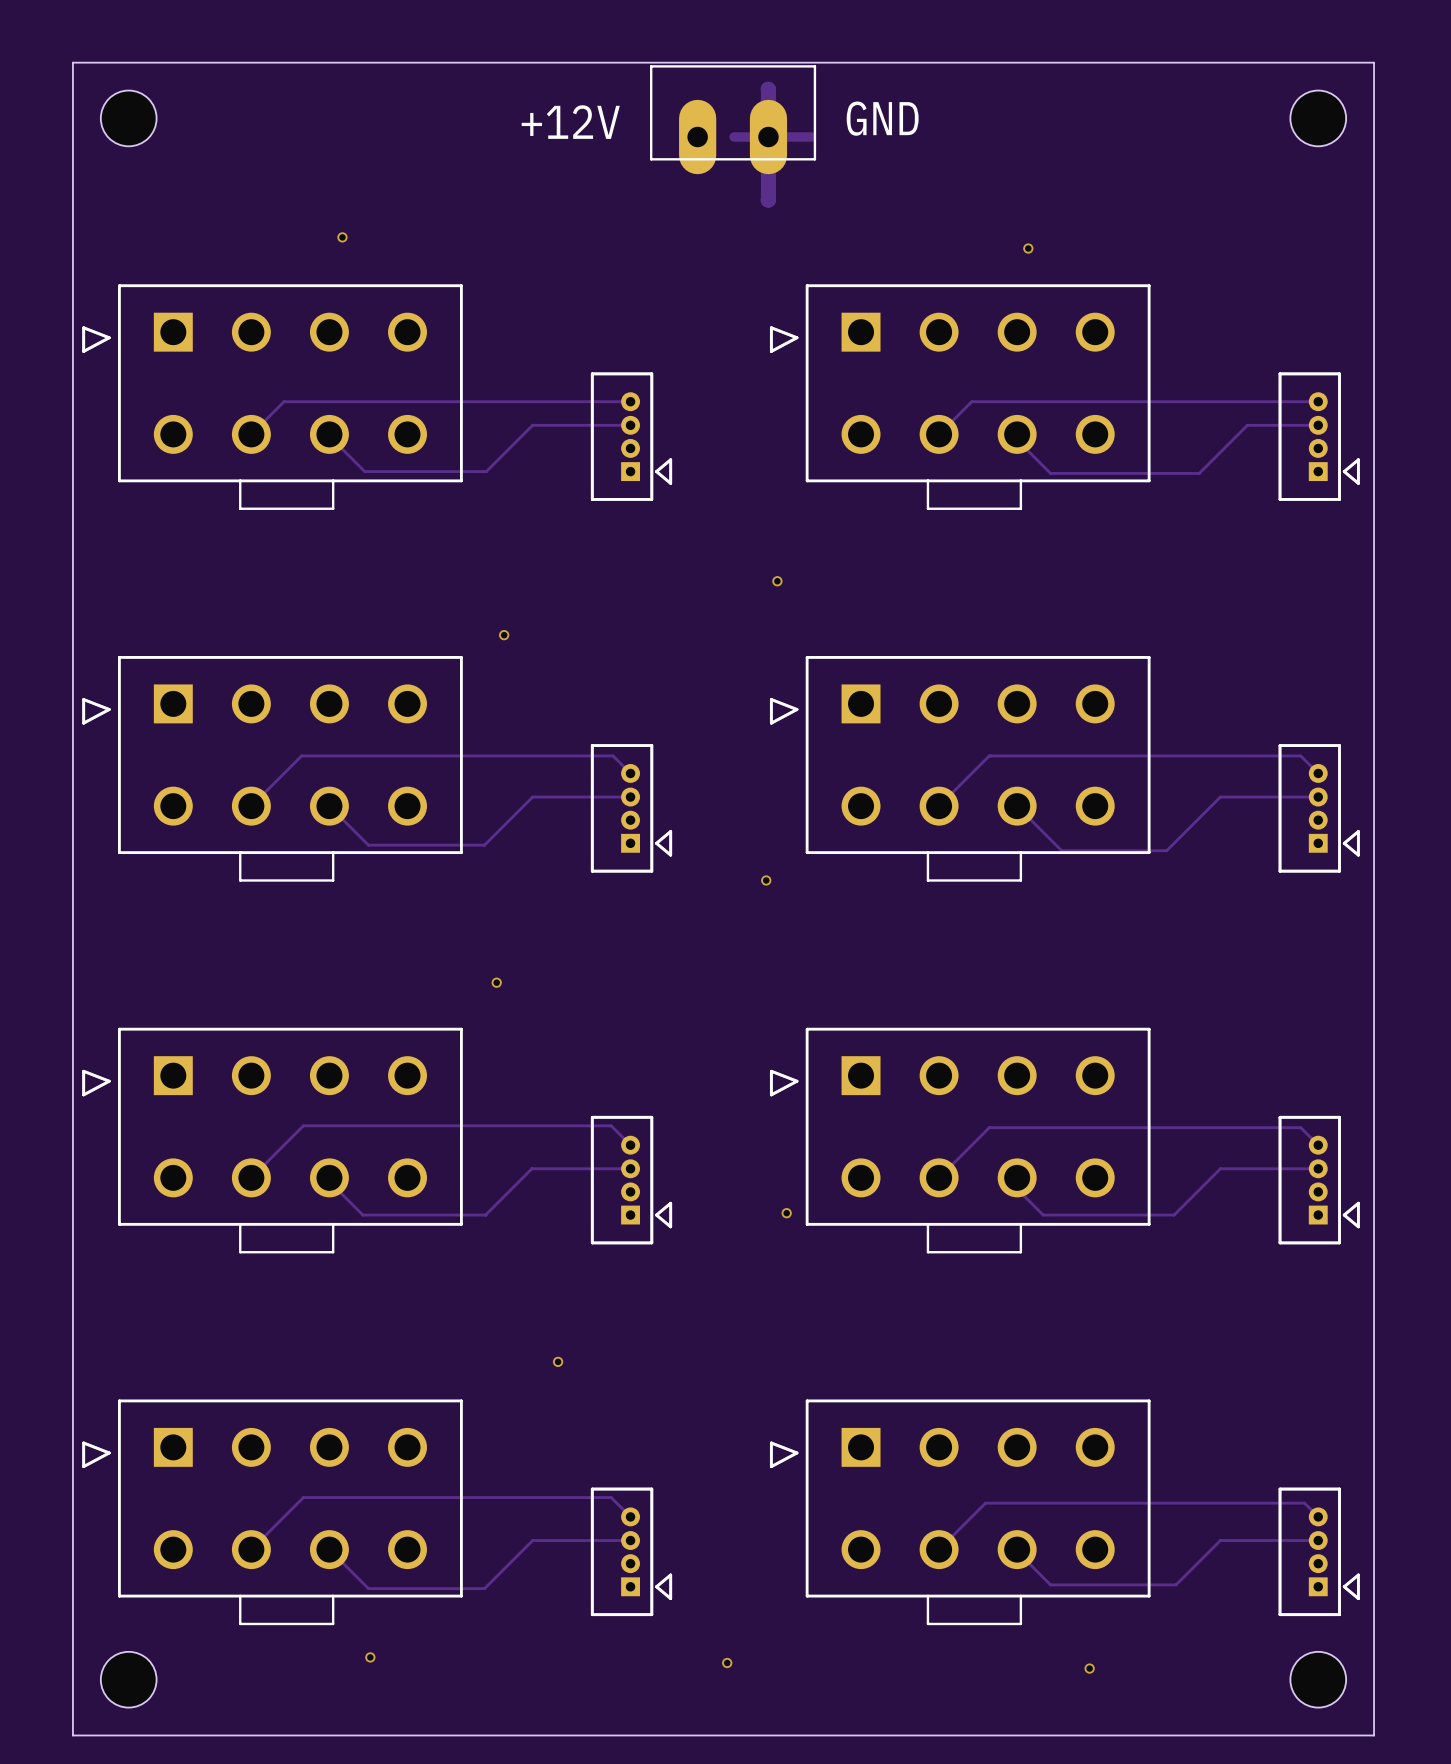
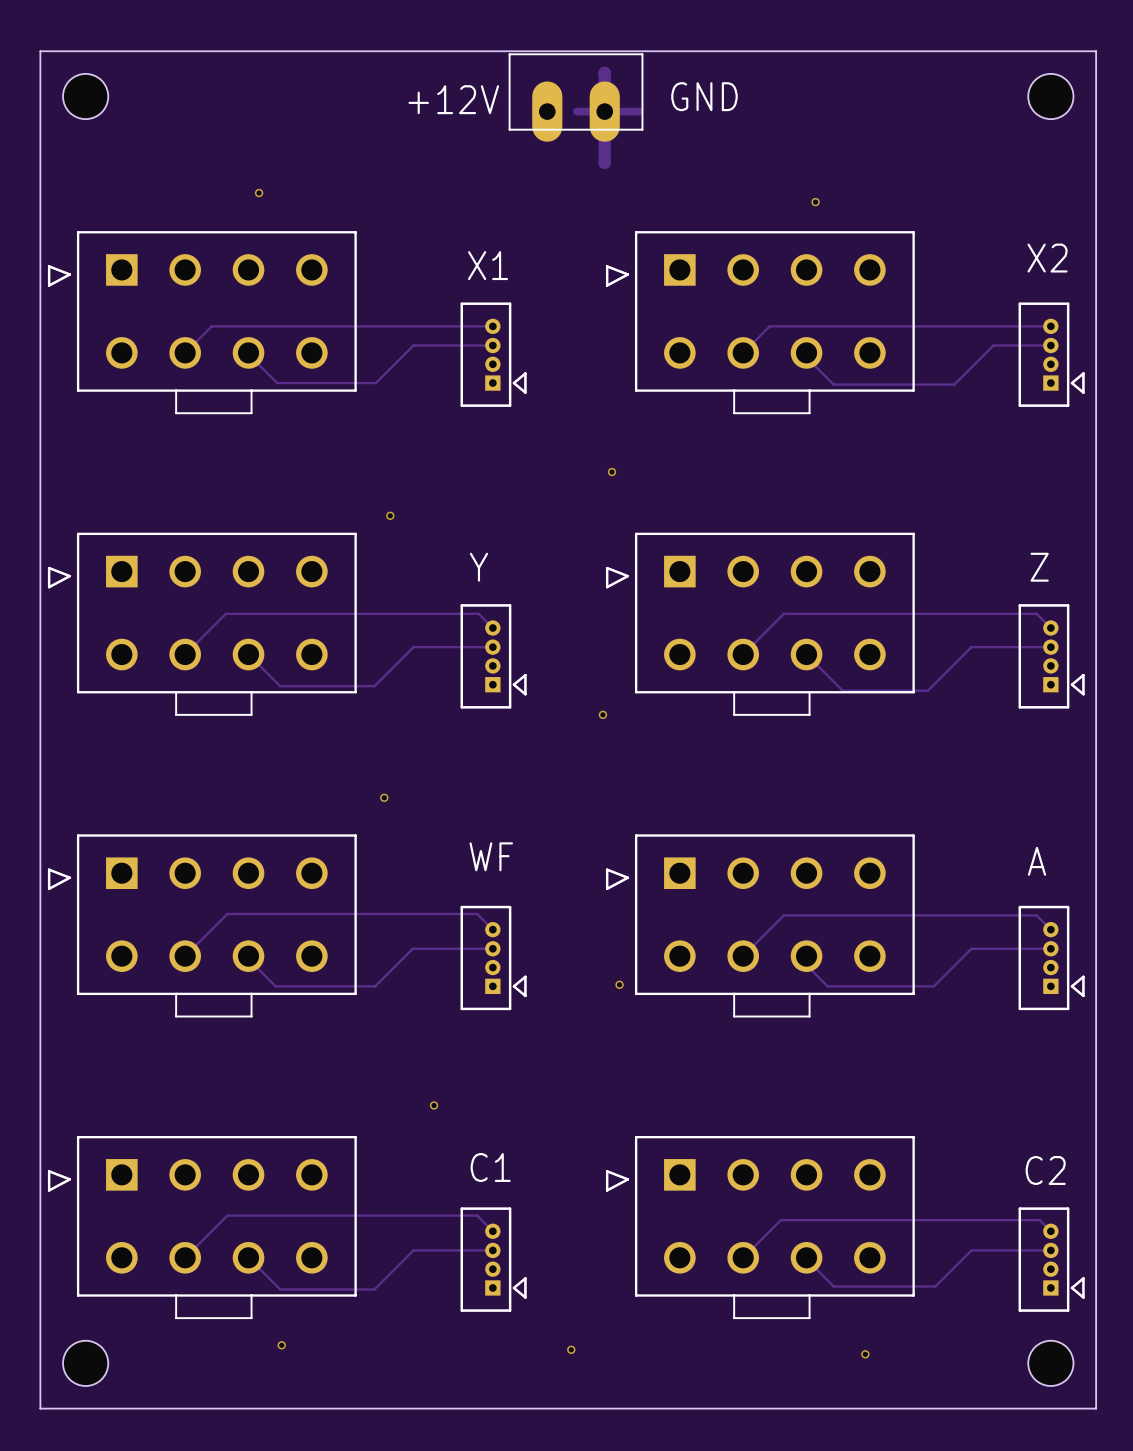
text: none -> X2 (1047, 258)
text: none -> X1 (488, 265)
text: none -> Y (478, 567)
text: none -> Z (1039, 567)
text: none -> WF (491, 856)
text: none -> A (1036, 861)
text: none -> C1 (490, 1167)
text: none -> C2 (1045, 1170)

